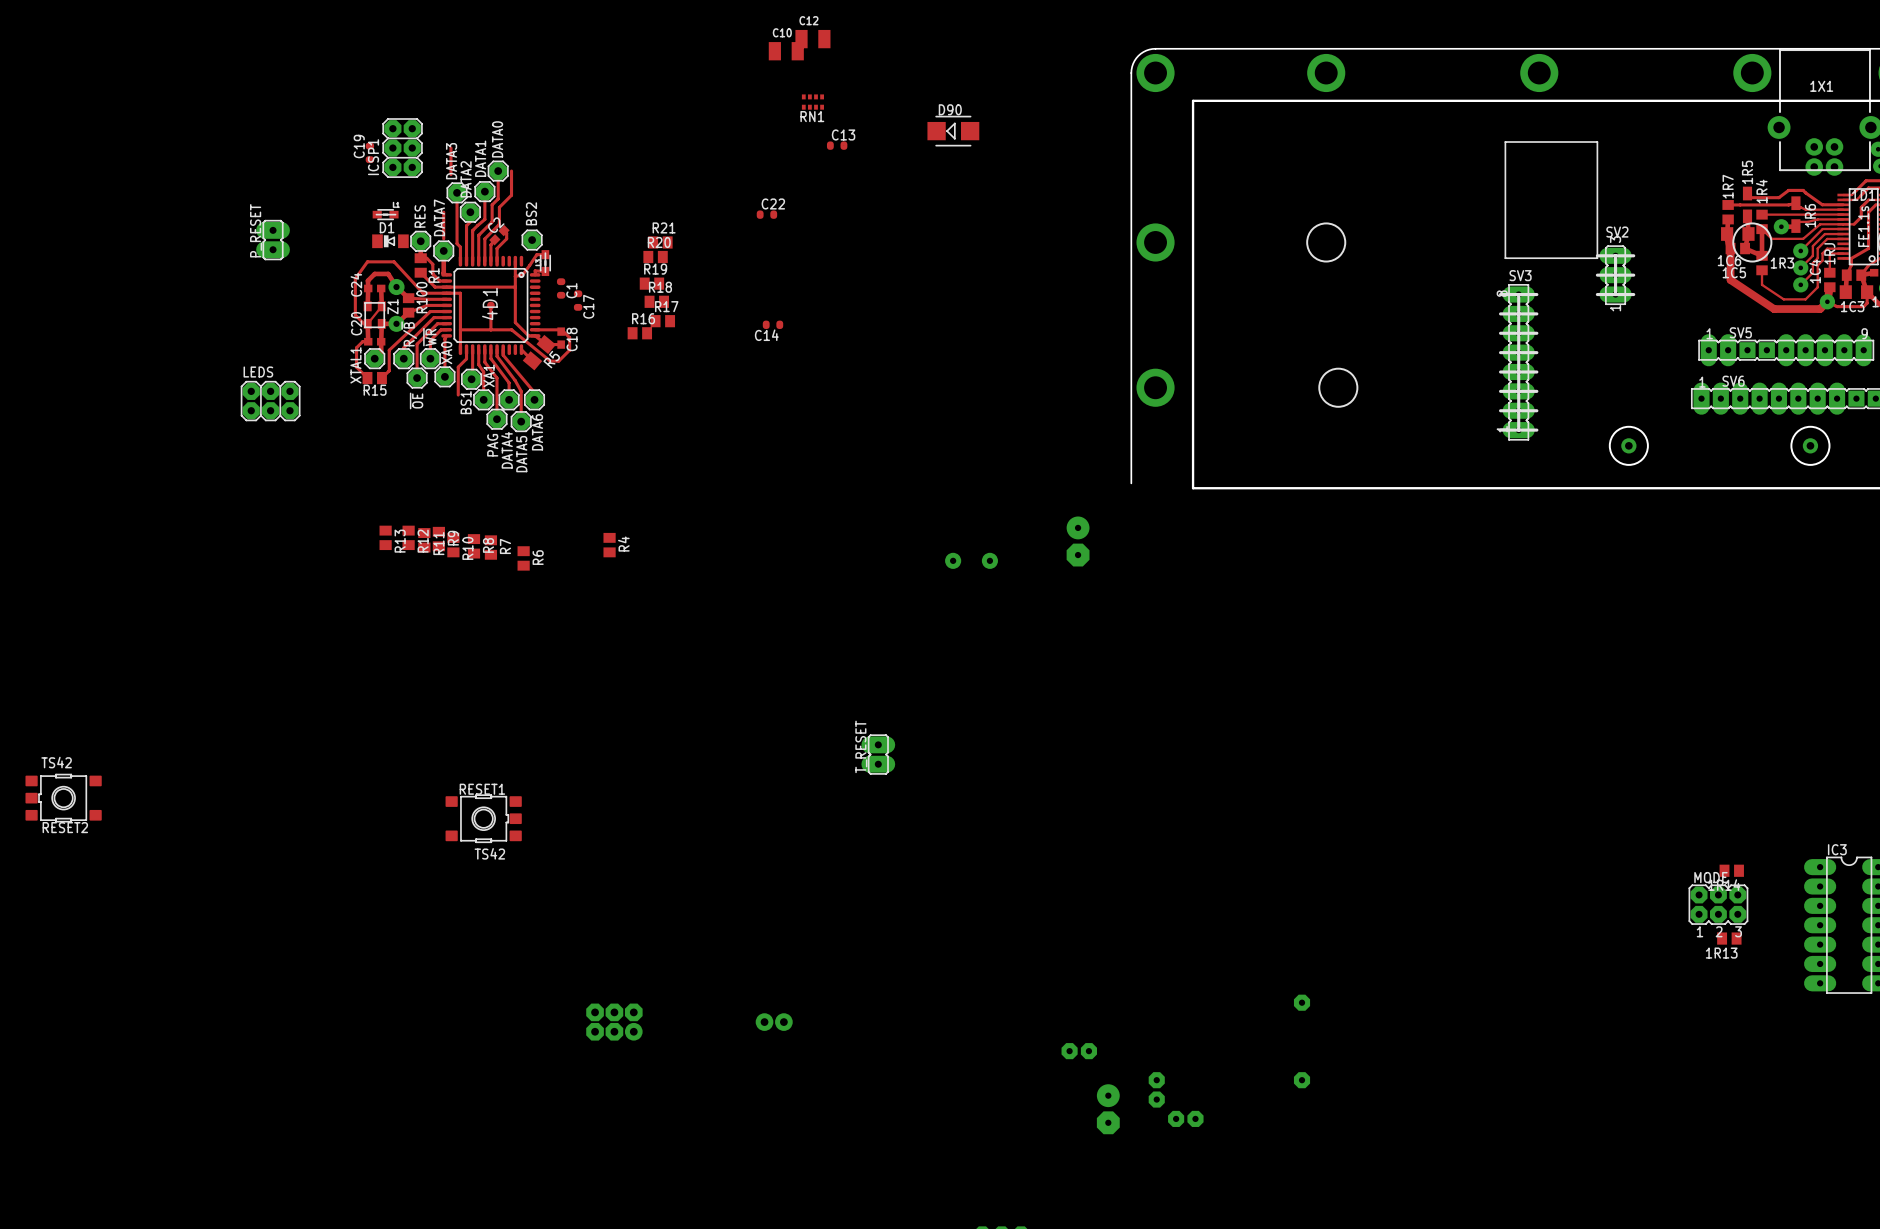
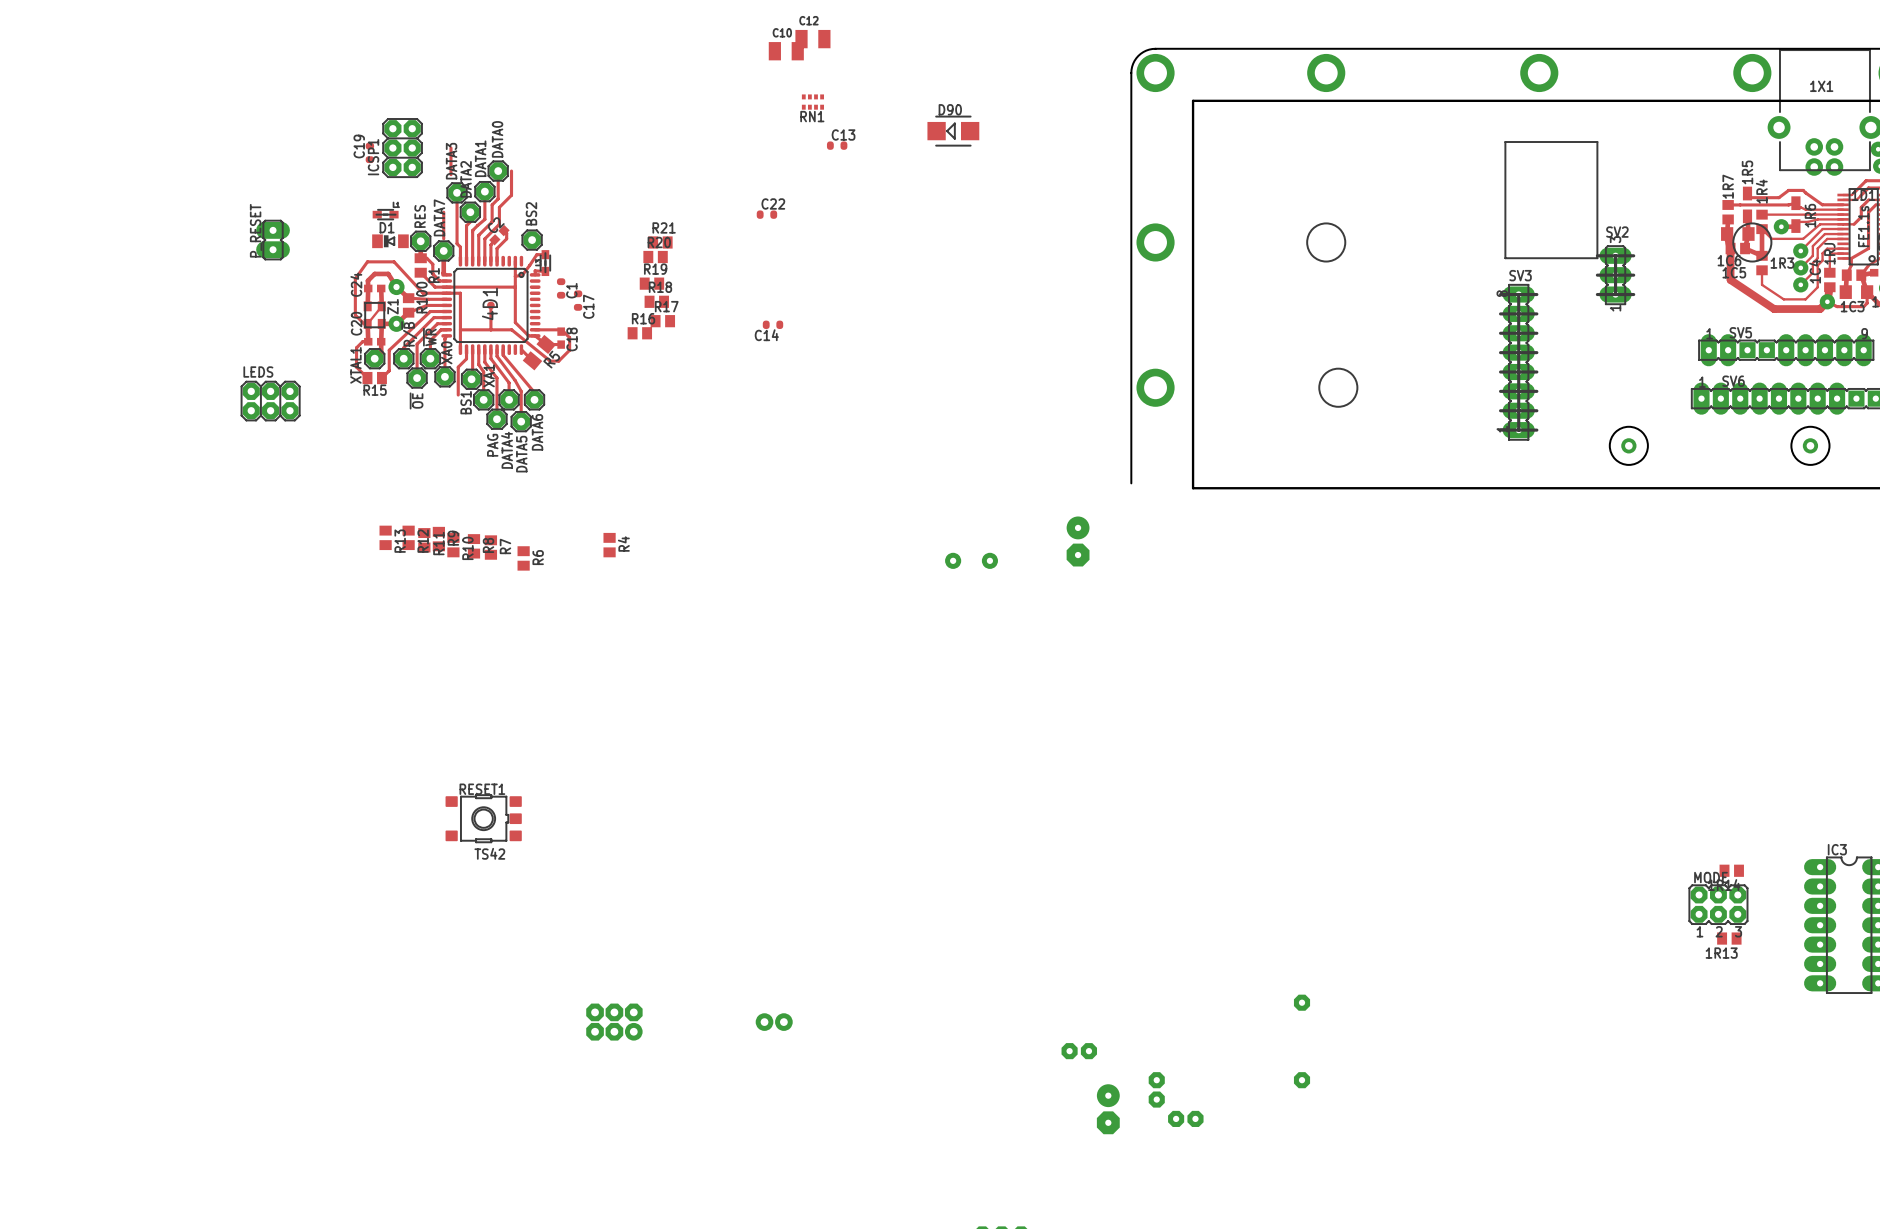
T_RESET: (878, 754) -> none
RESET2: TS42 (63, 798) -> none

